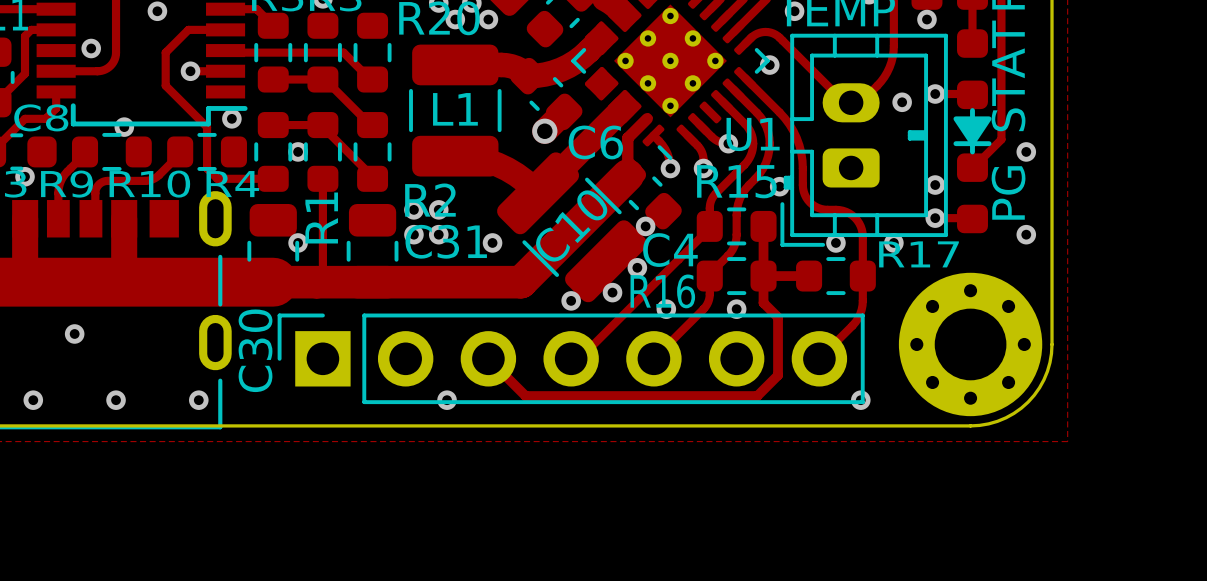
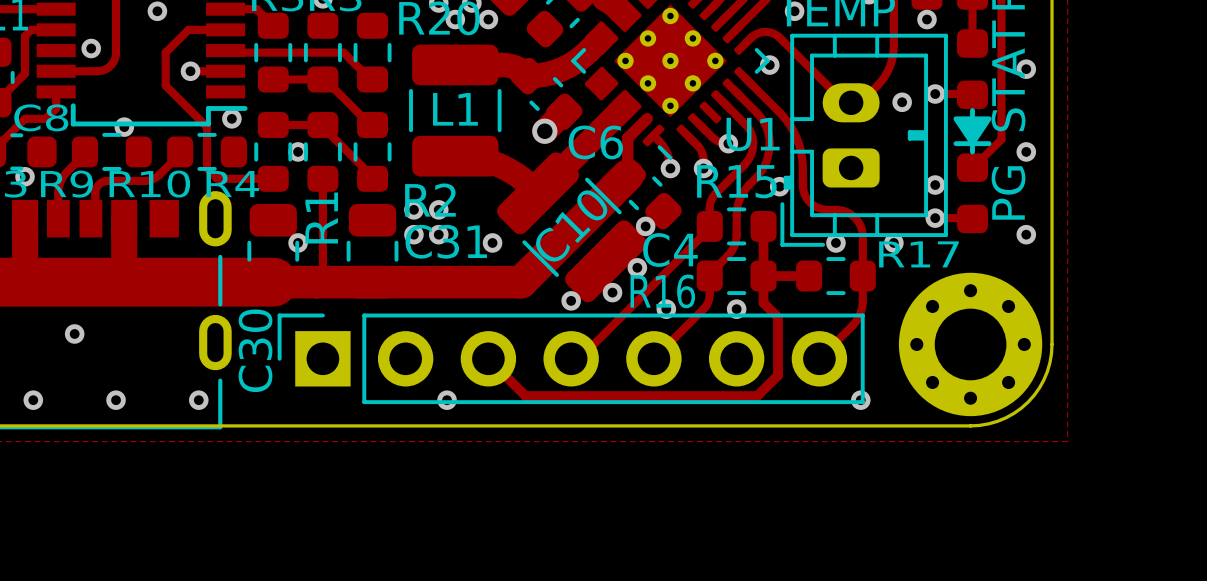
via: none -> (1026, 69)

